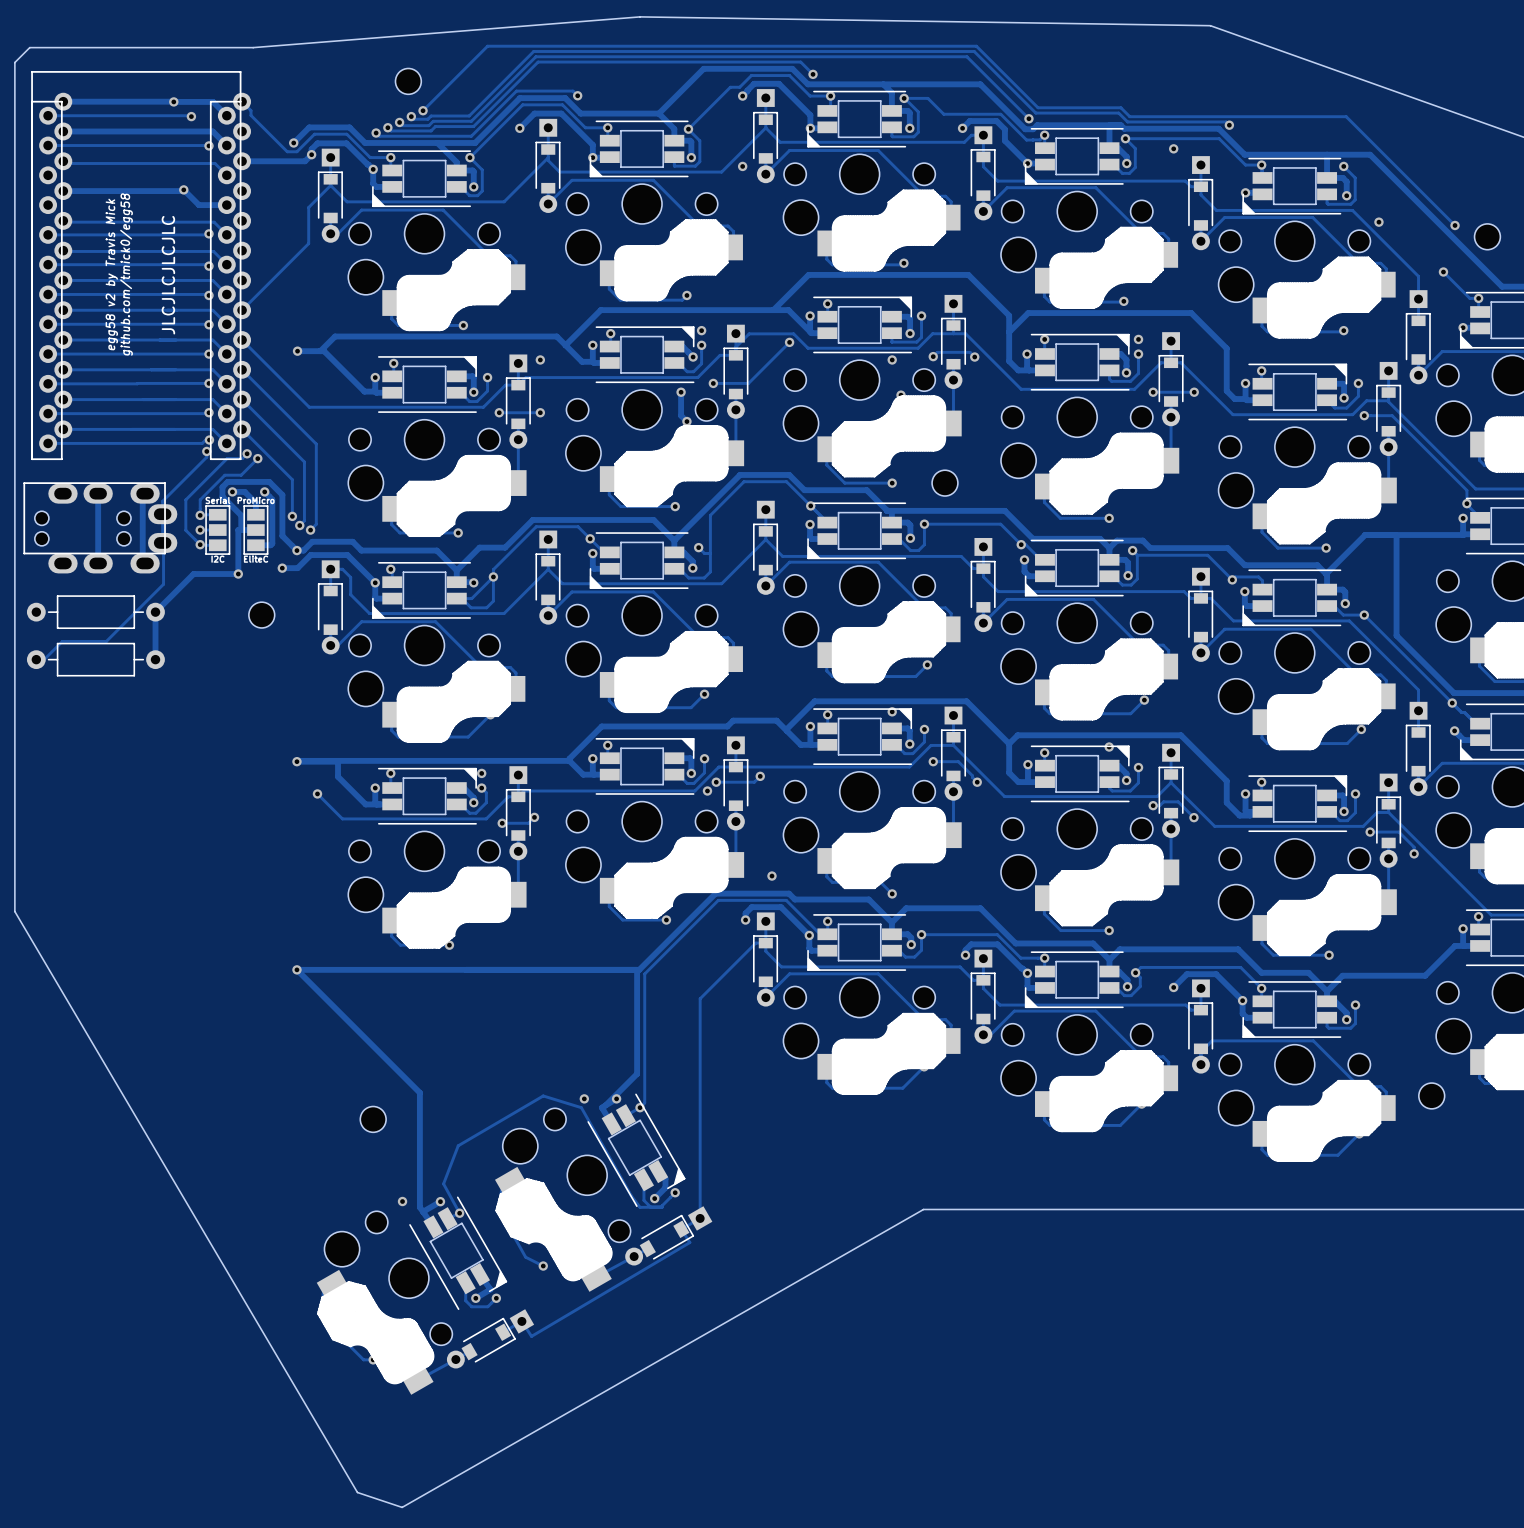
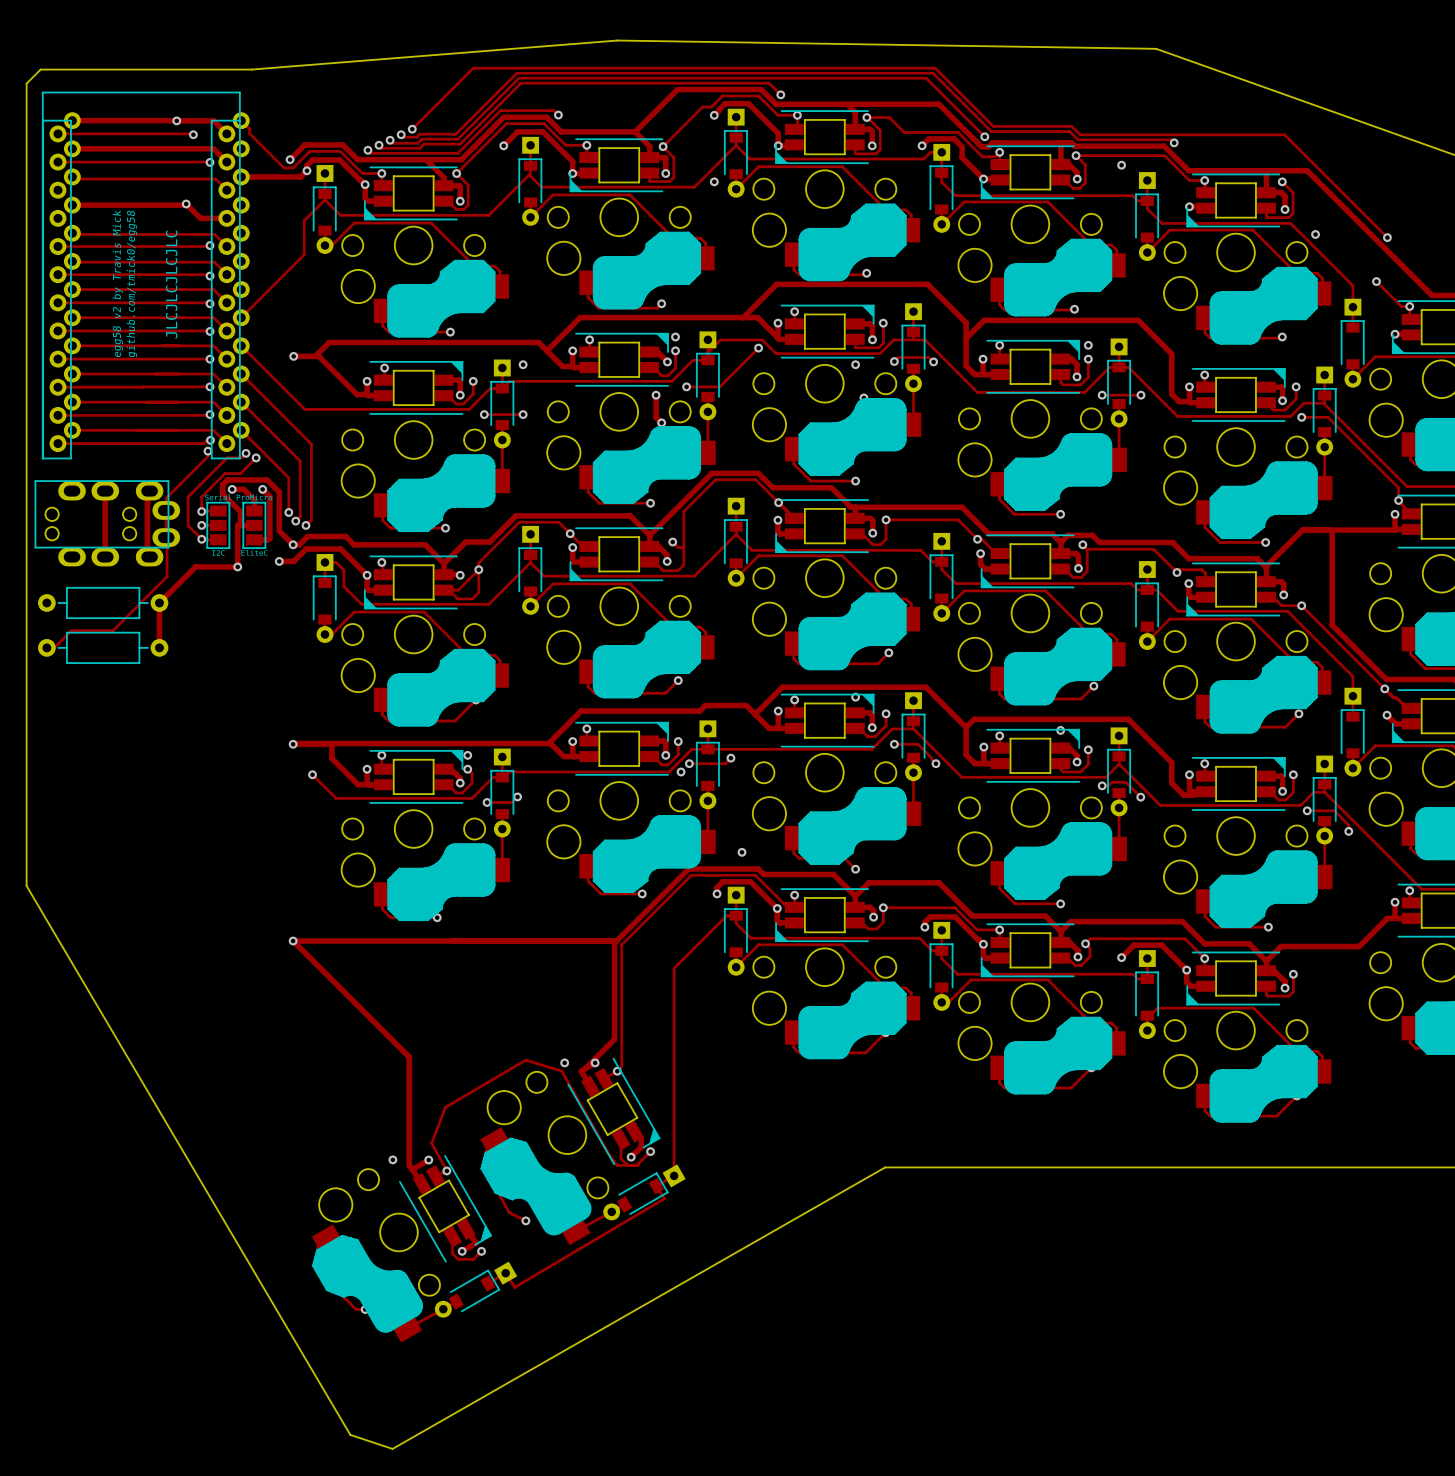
part: (408, 81) -> none
part: (1487, 236) -> none
part: (944, 483) -> none
part: (261, 615) -> none
part: (1431, 1095) -> none
part: (373, 1119) -> none

